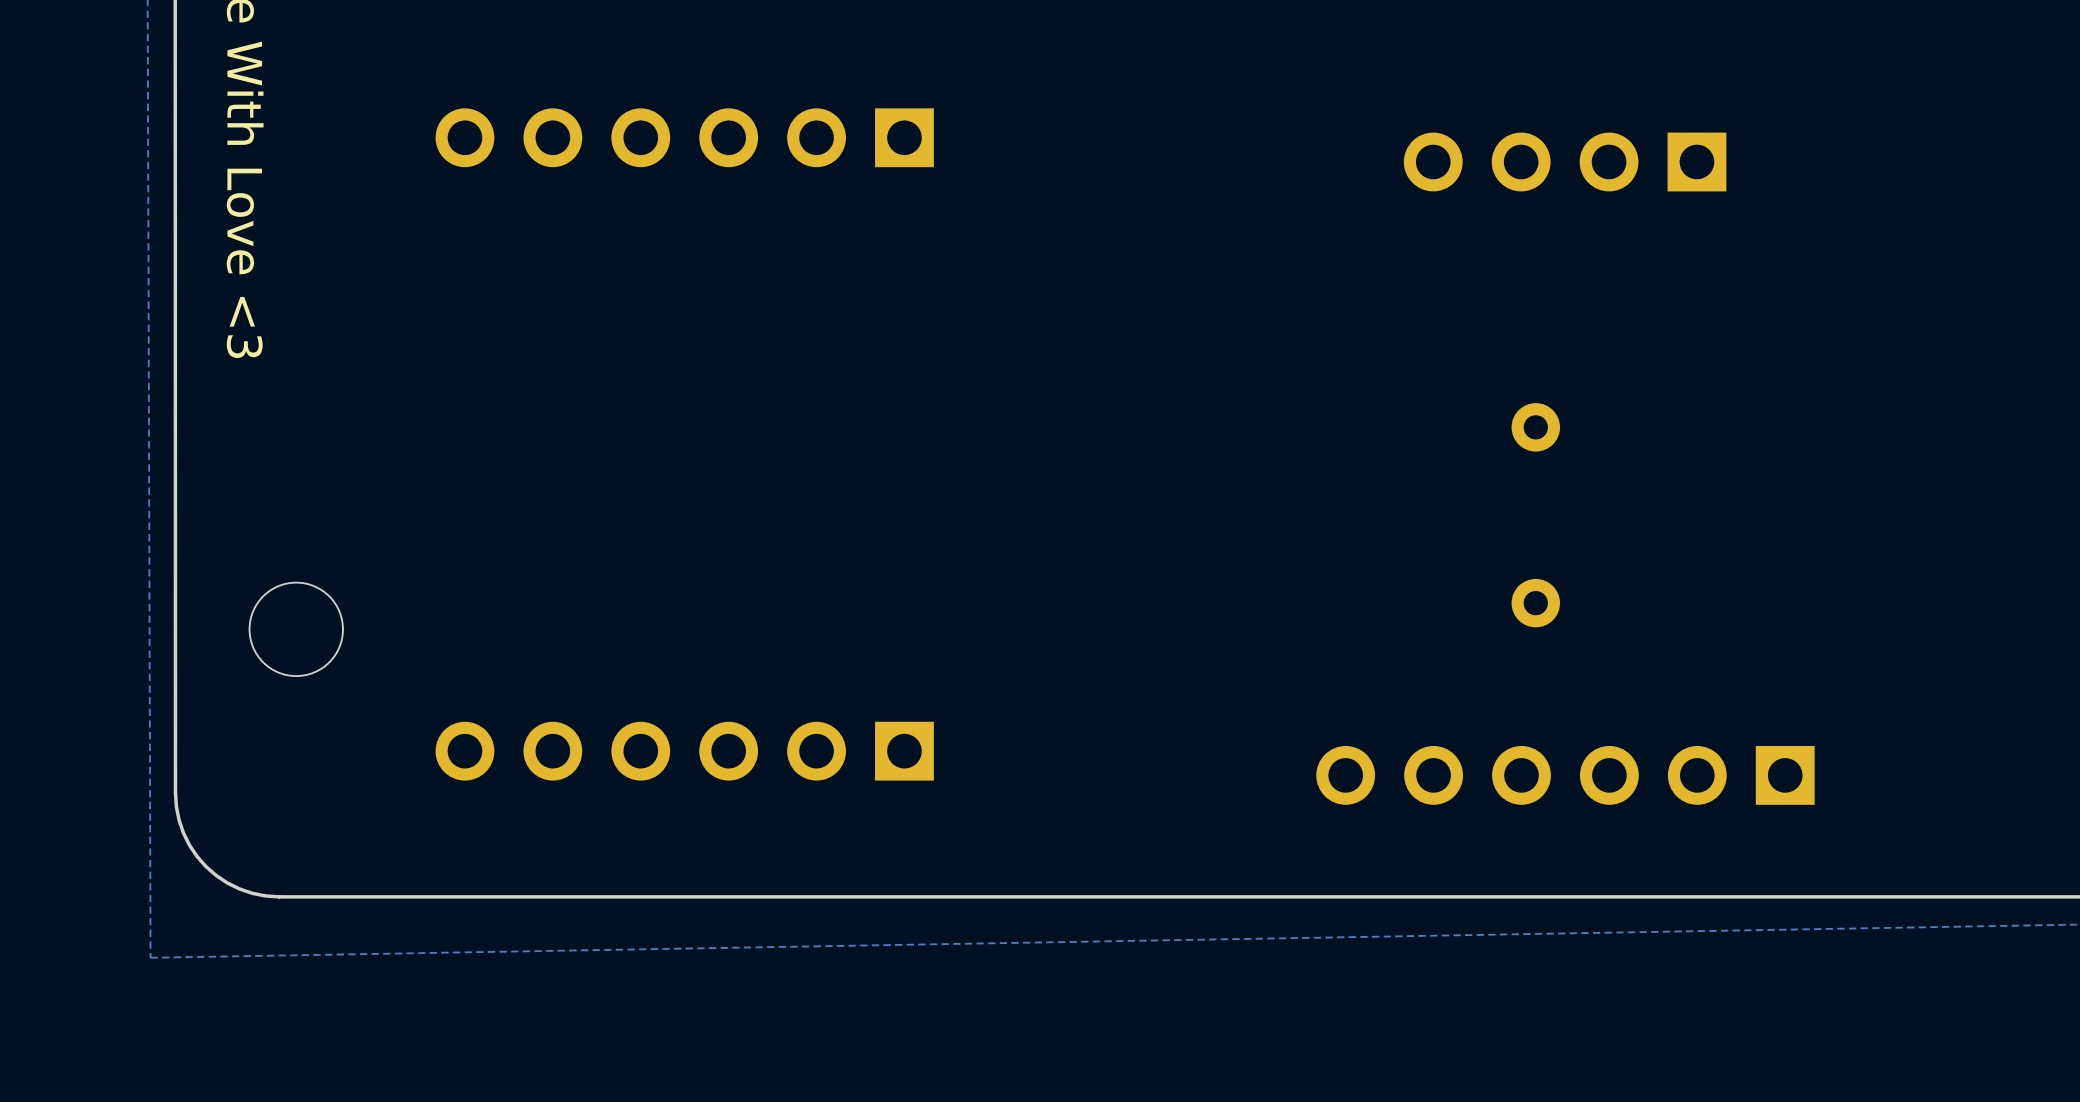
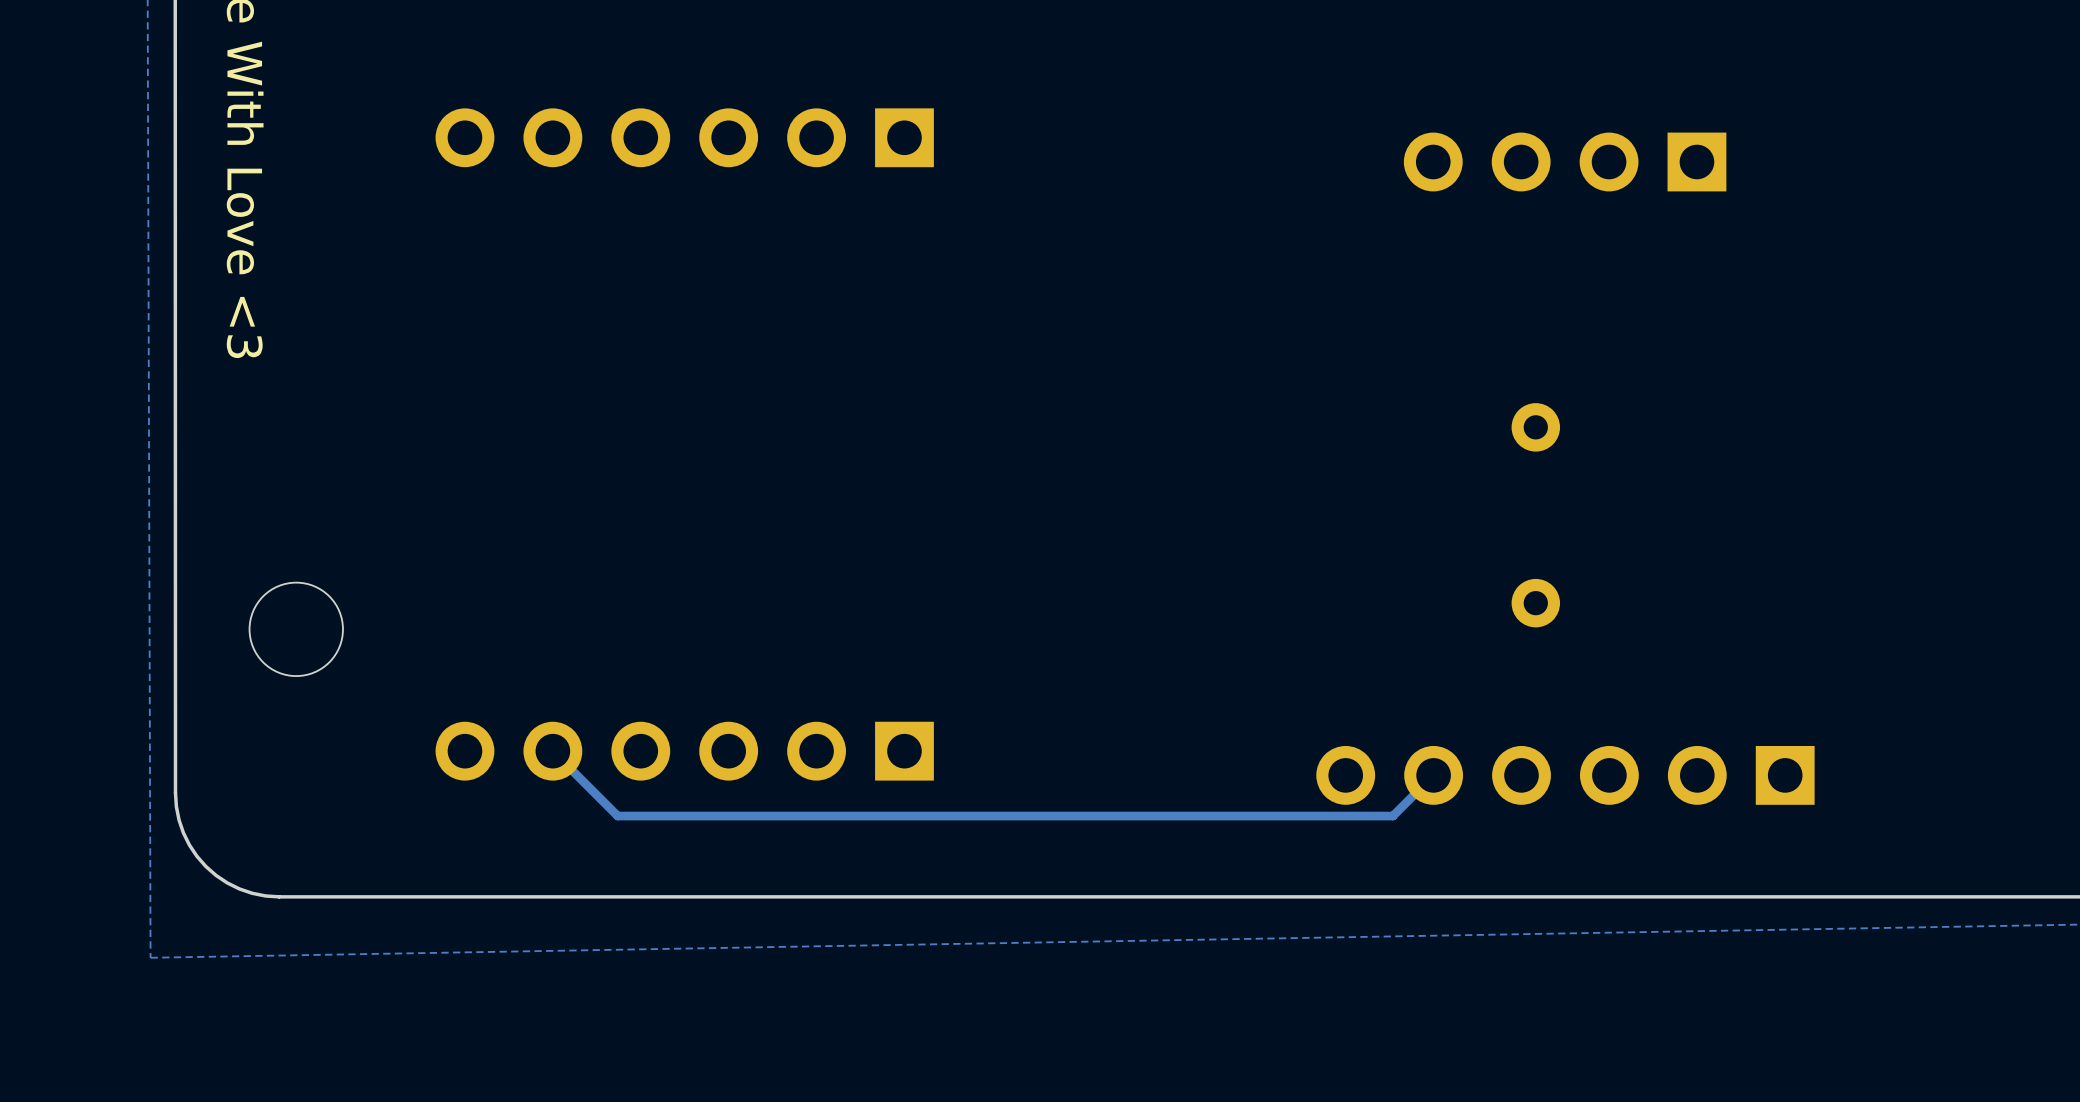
track: none -> (552, 751) (617, 816) (1392, 816) (1433, 775)

